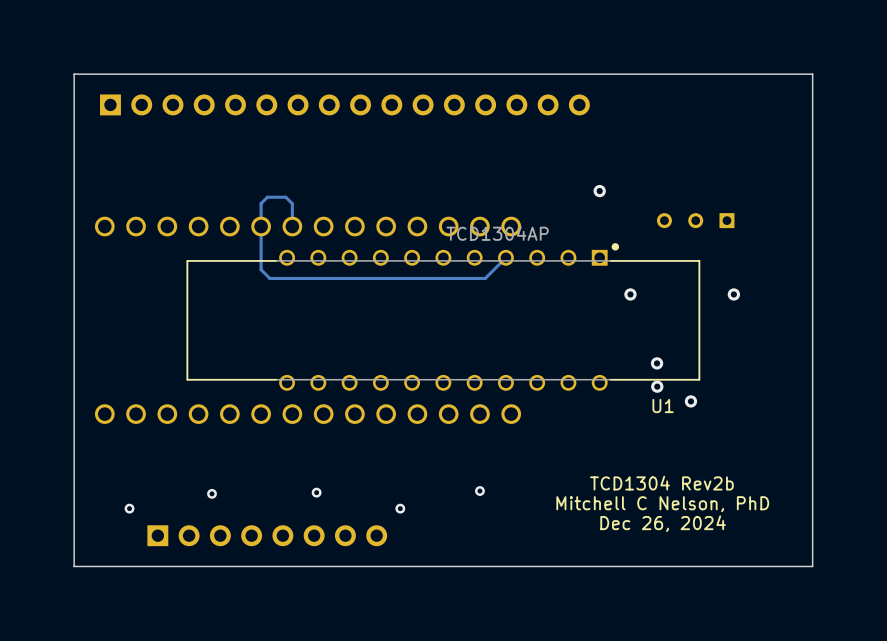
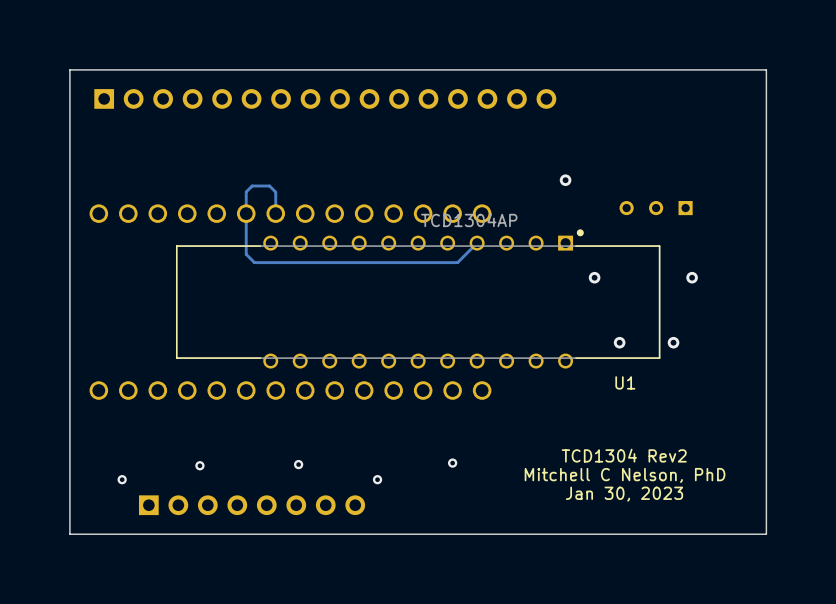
via: none -> (673, 342)
via: (657, 386) -> none
via: (690, 401) -> none
text: TCD1304 Rev2b (661, 483) -> TCD1304 Rev2 (624, 455)
text: Dec 26, 2024 (663, 523) -> Jan 30, 2023 (624, 494)

